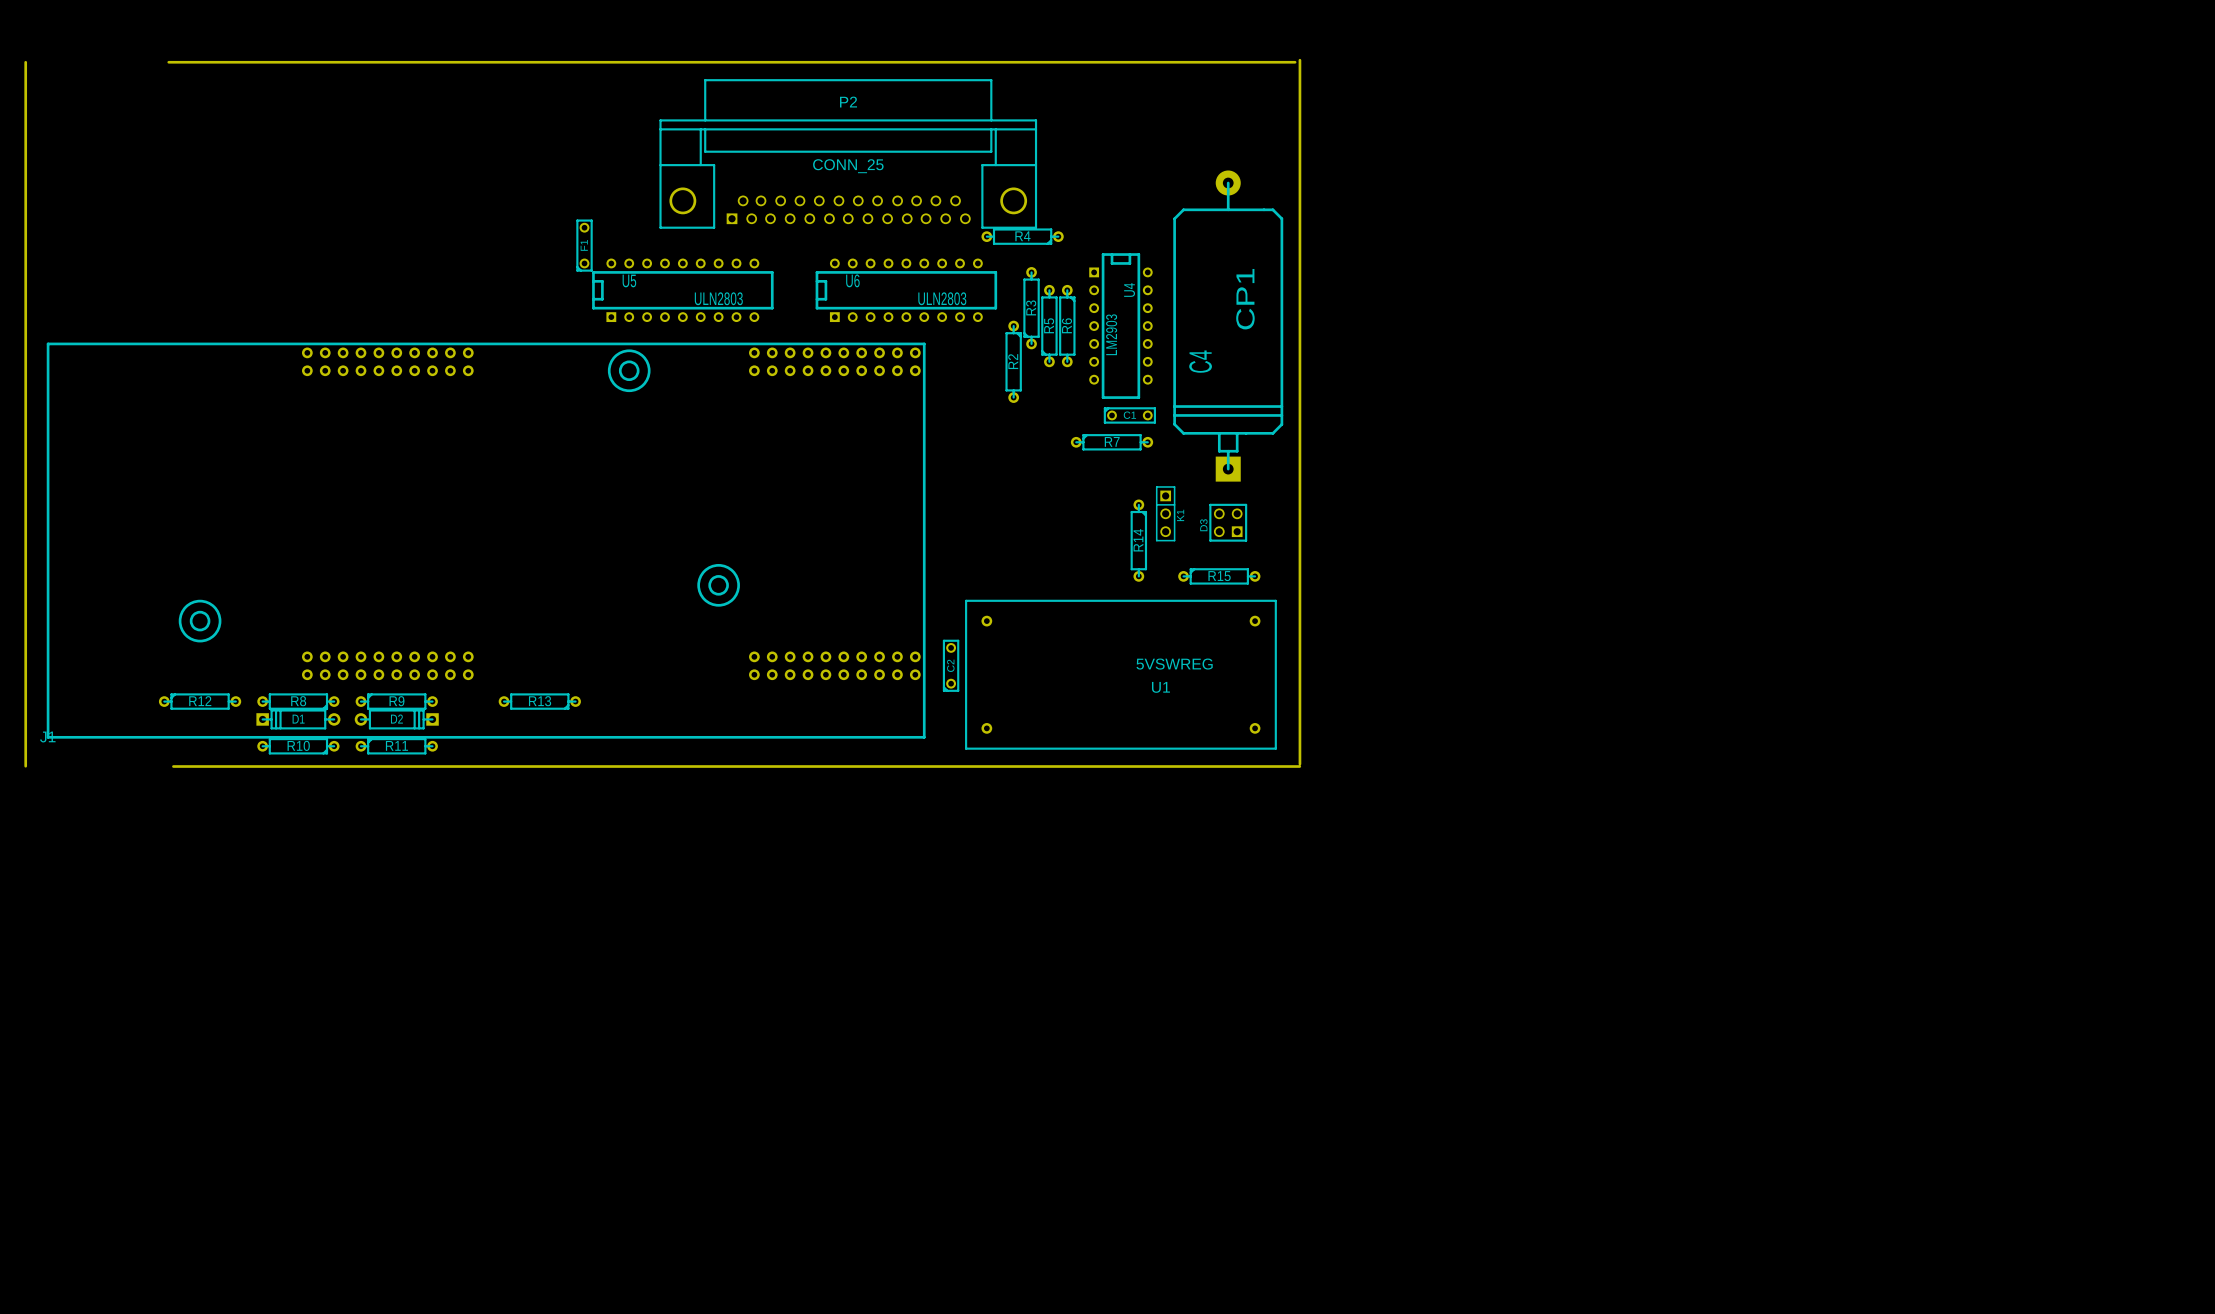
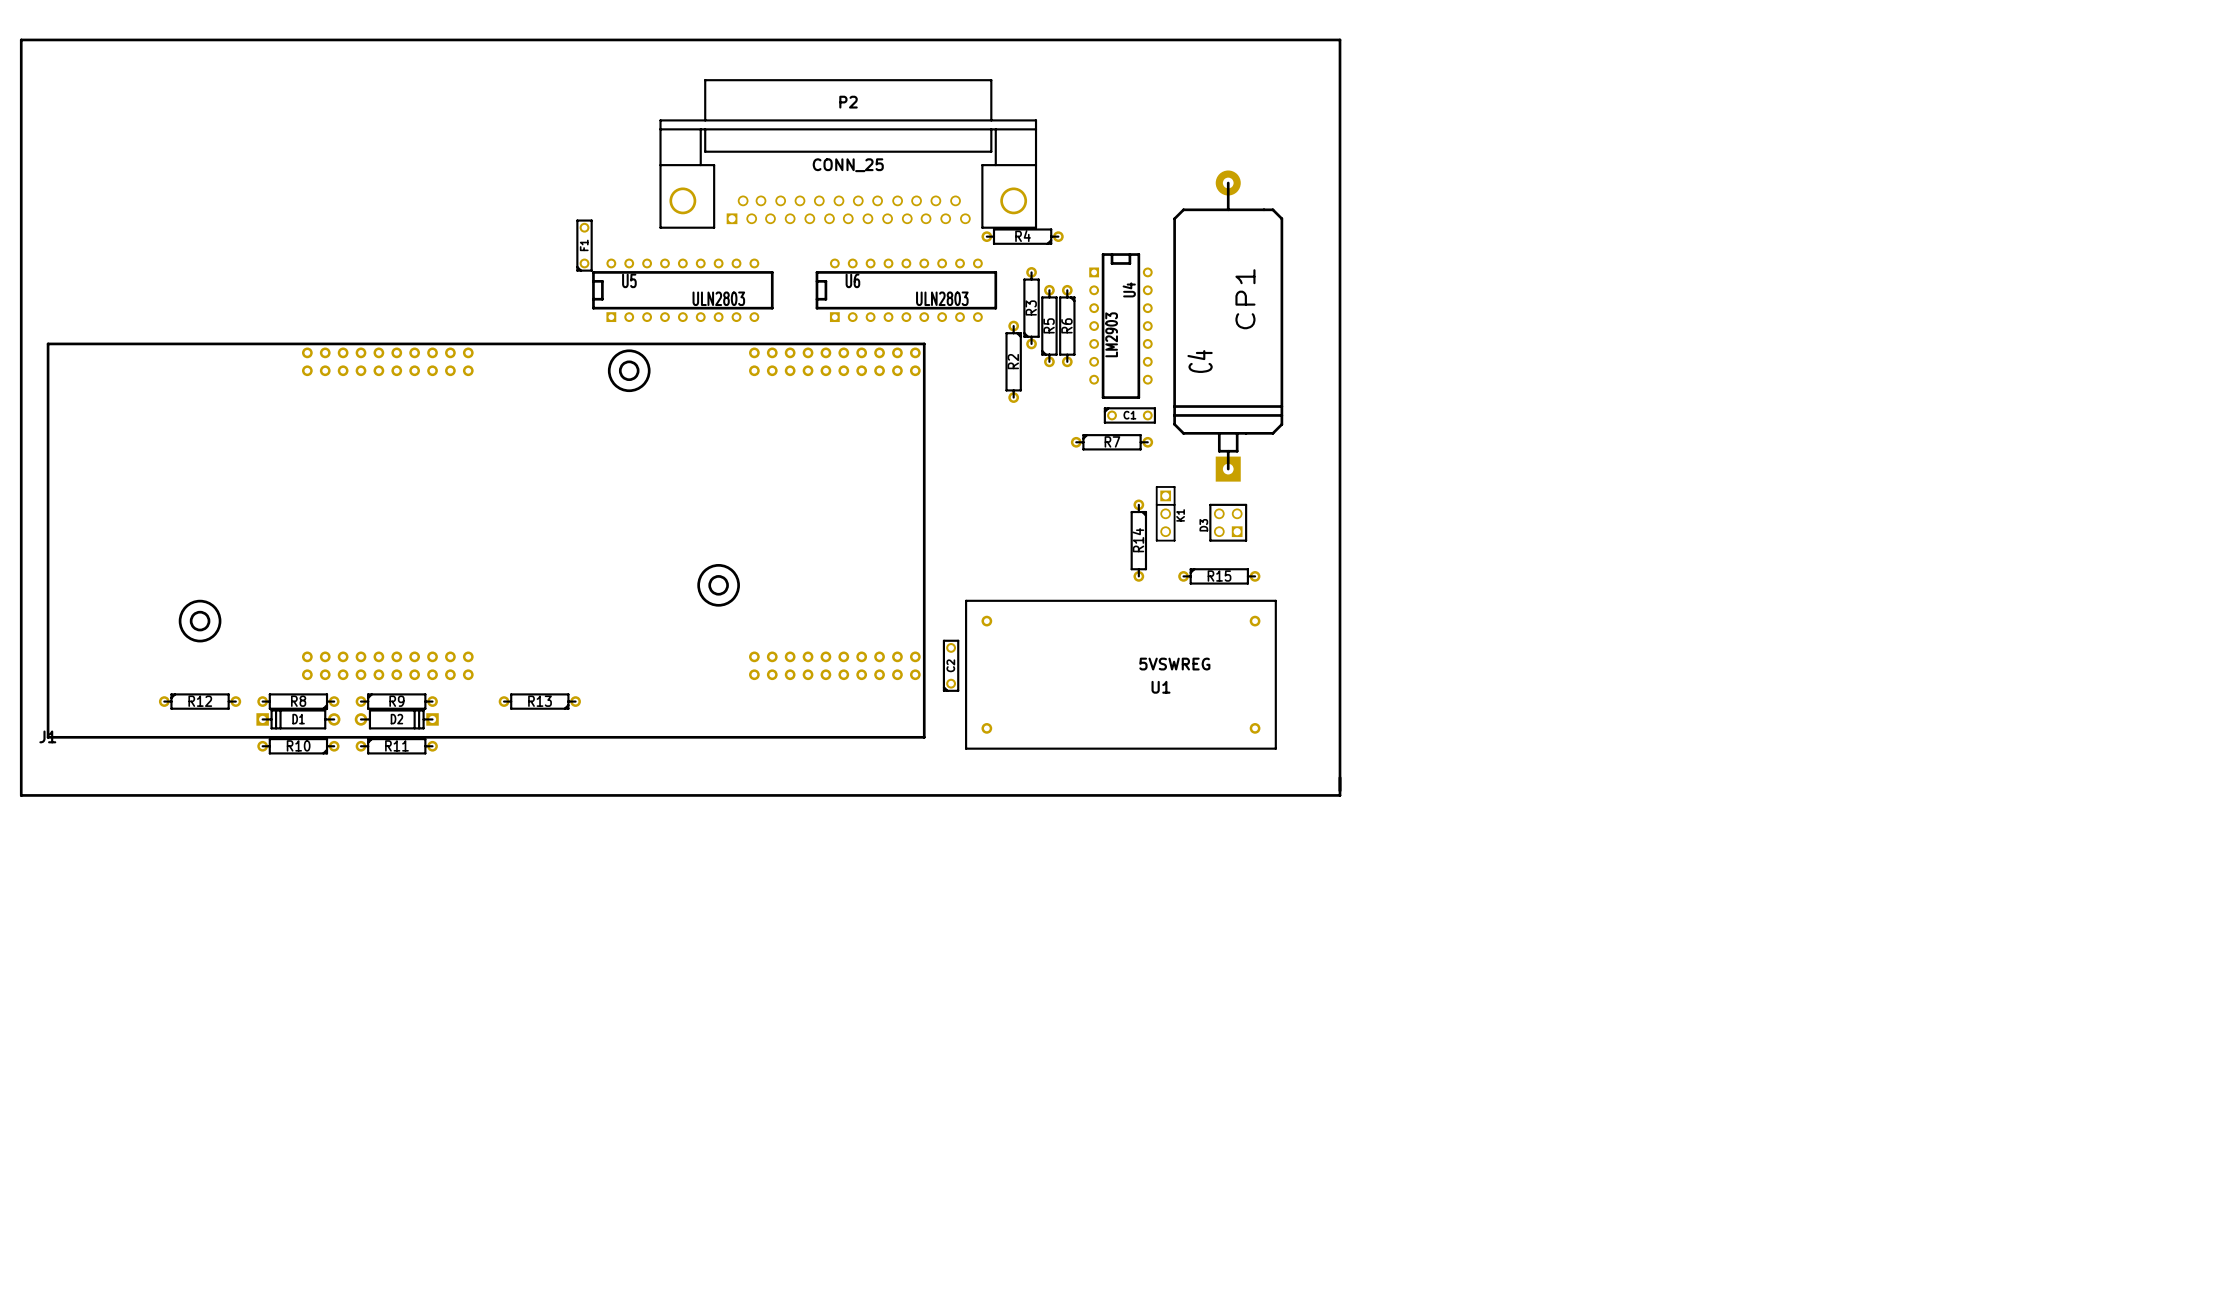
line: none -> (21, 39) (21, 795) (1340, 795) (1340, 39) (21, 39)
board edge: (1299, 60) (1299, 764) -> none
board edge: (25, 62) (25, 766) -> none
board edge: (168, 62) (1295, 62) -> none
board edge: (173, 766) (1299, 766) -> none

